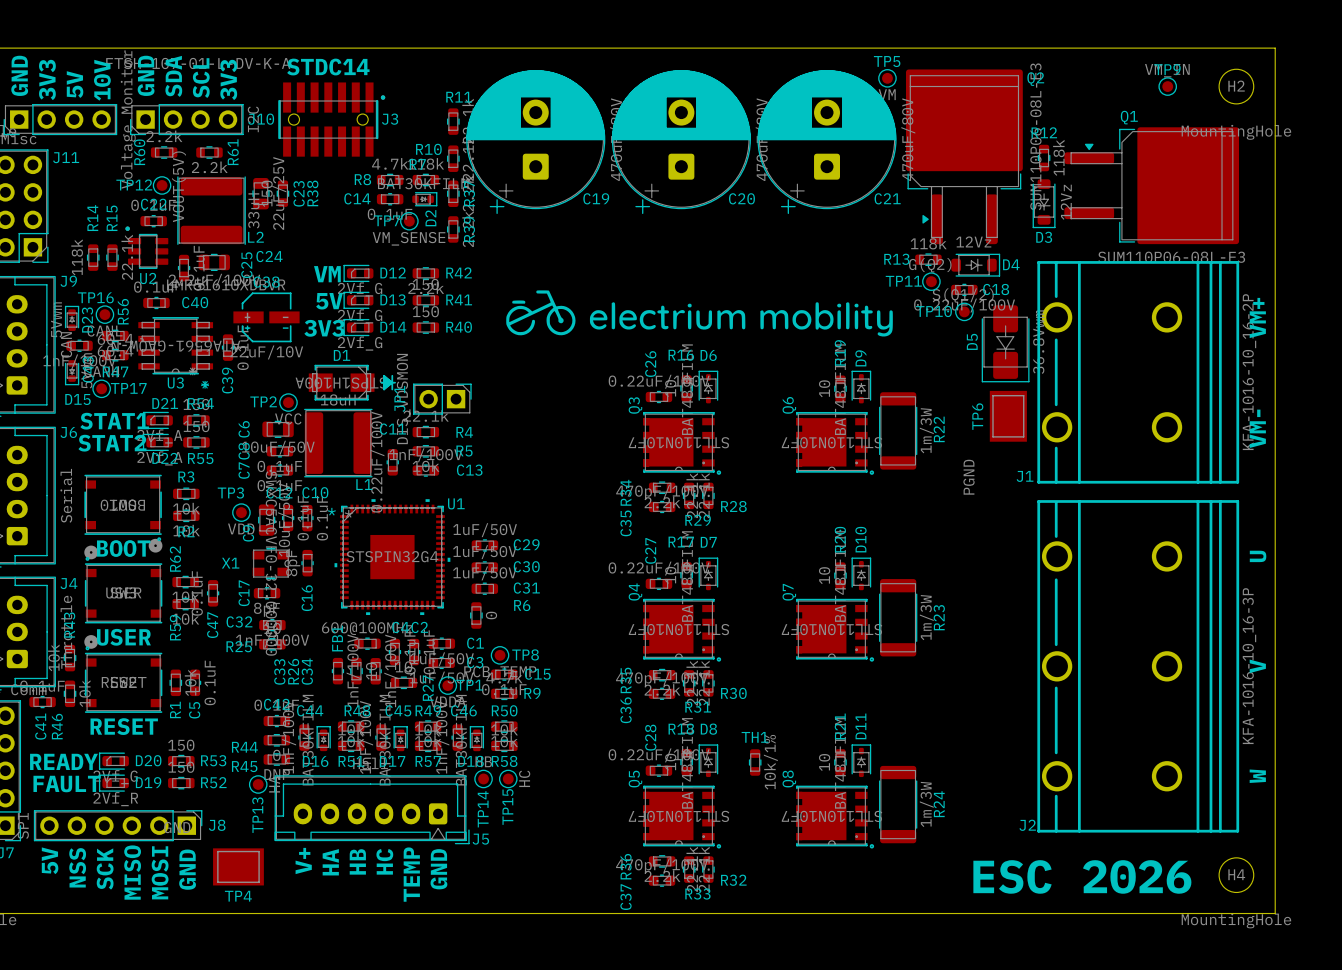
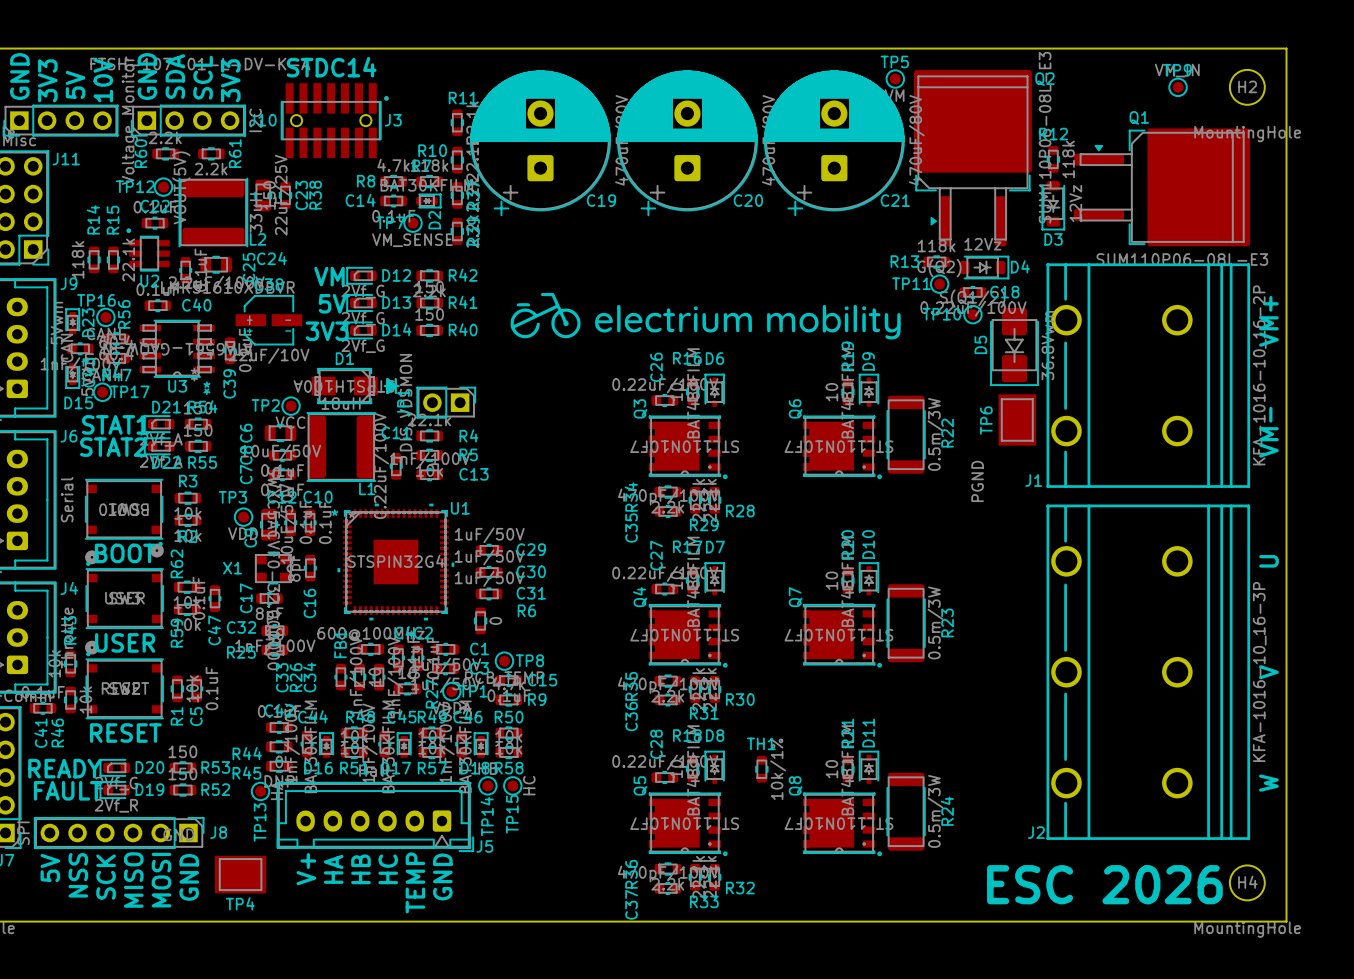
R22 value: 1m/3W (926, 430) -> 0.5m/3W (935, 434)
R23 value: 1m/3W (926, 617) -> 0.5m/3W (935, 622)
R24 value: 1m/3W (926, 804) -> 0.5m/3W (935, 811)

